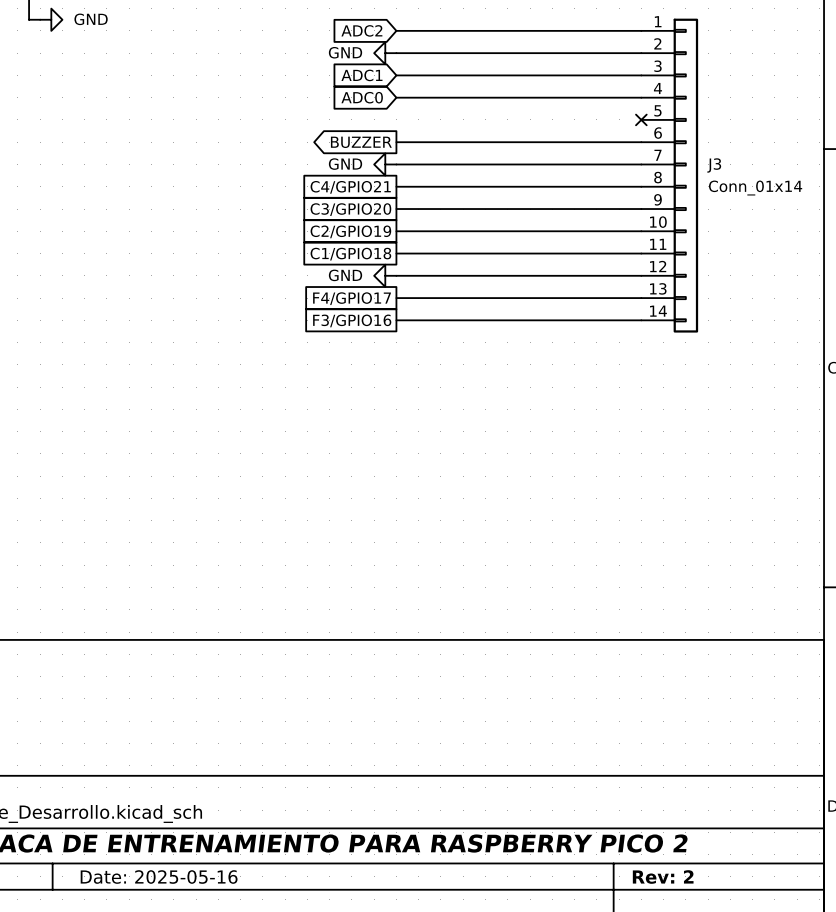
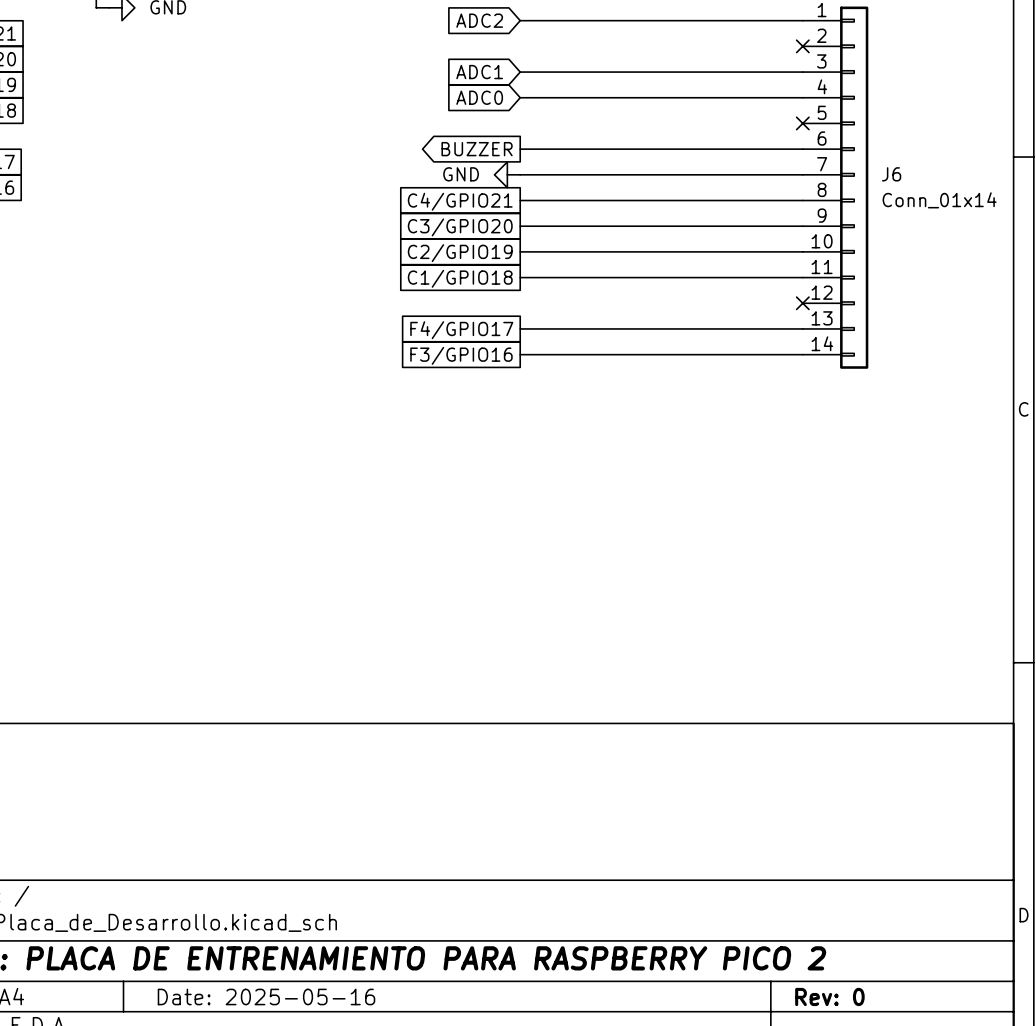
power symbol: GND (385, 53) -> none
wire: (396, 53) (641, 53) -> none
no-connect mark: none -> (802, 46)
J3 name: J3 (714, 165) -> J6 (891, 174)
power symbol: GND (385, 275) -> none
wire: (396, 275) (641, 275) -> none
no-connect mark: none -> (802, 303)
title block: Rev: 2 (663, 877) -> Rev: 0 (829, 996)

